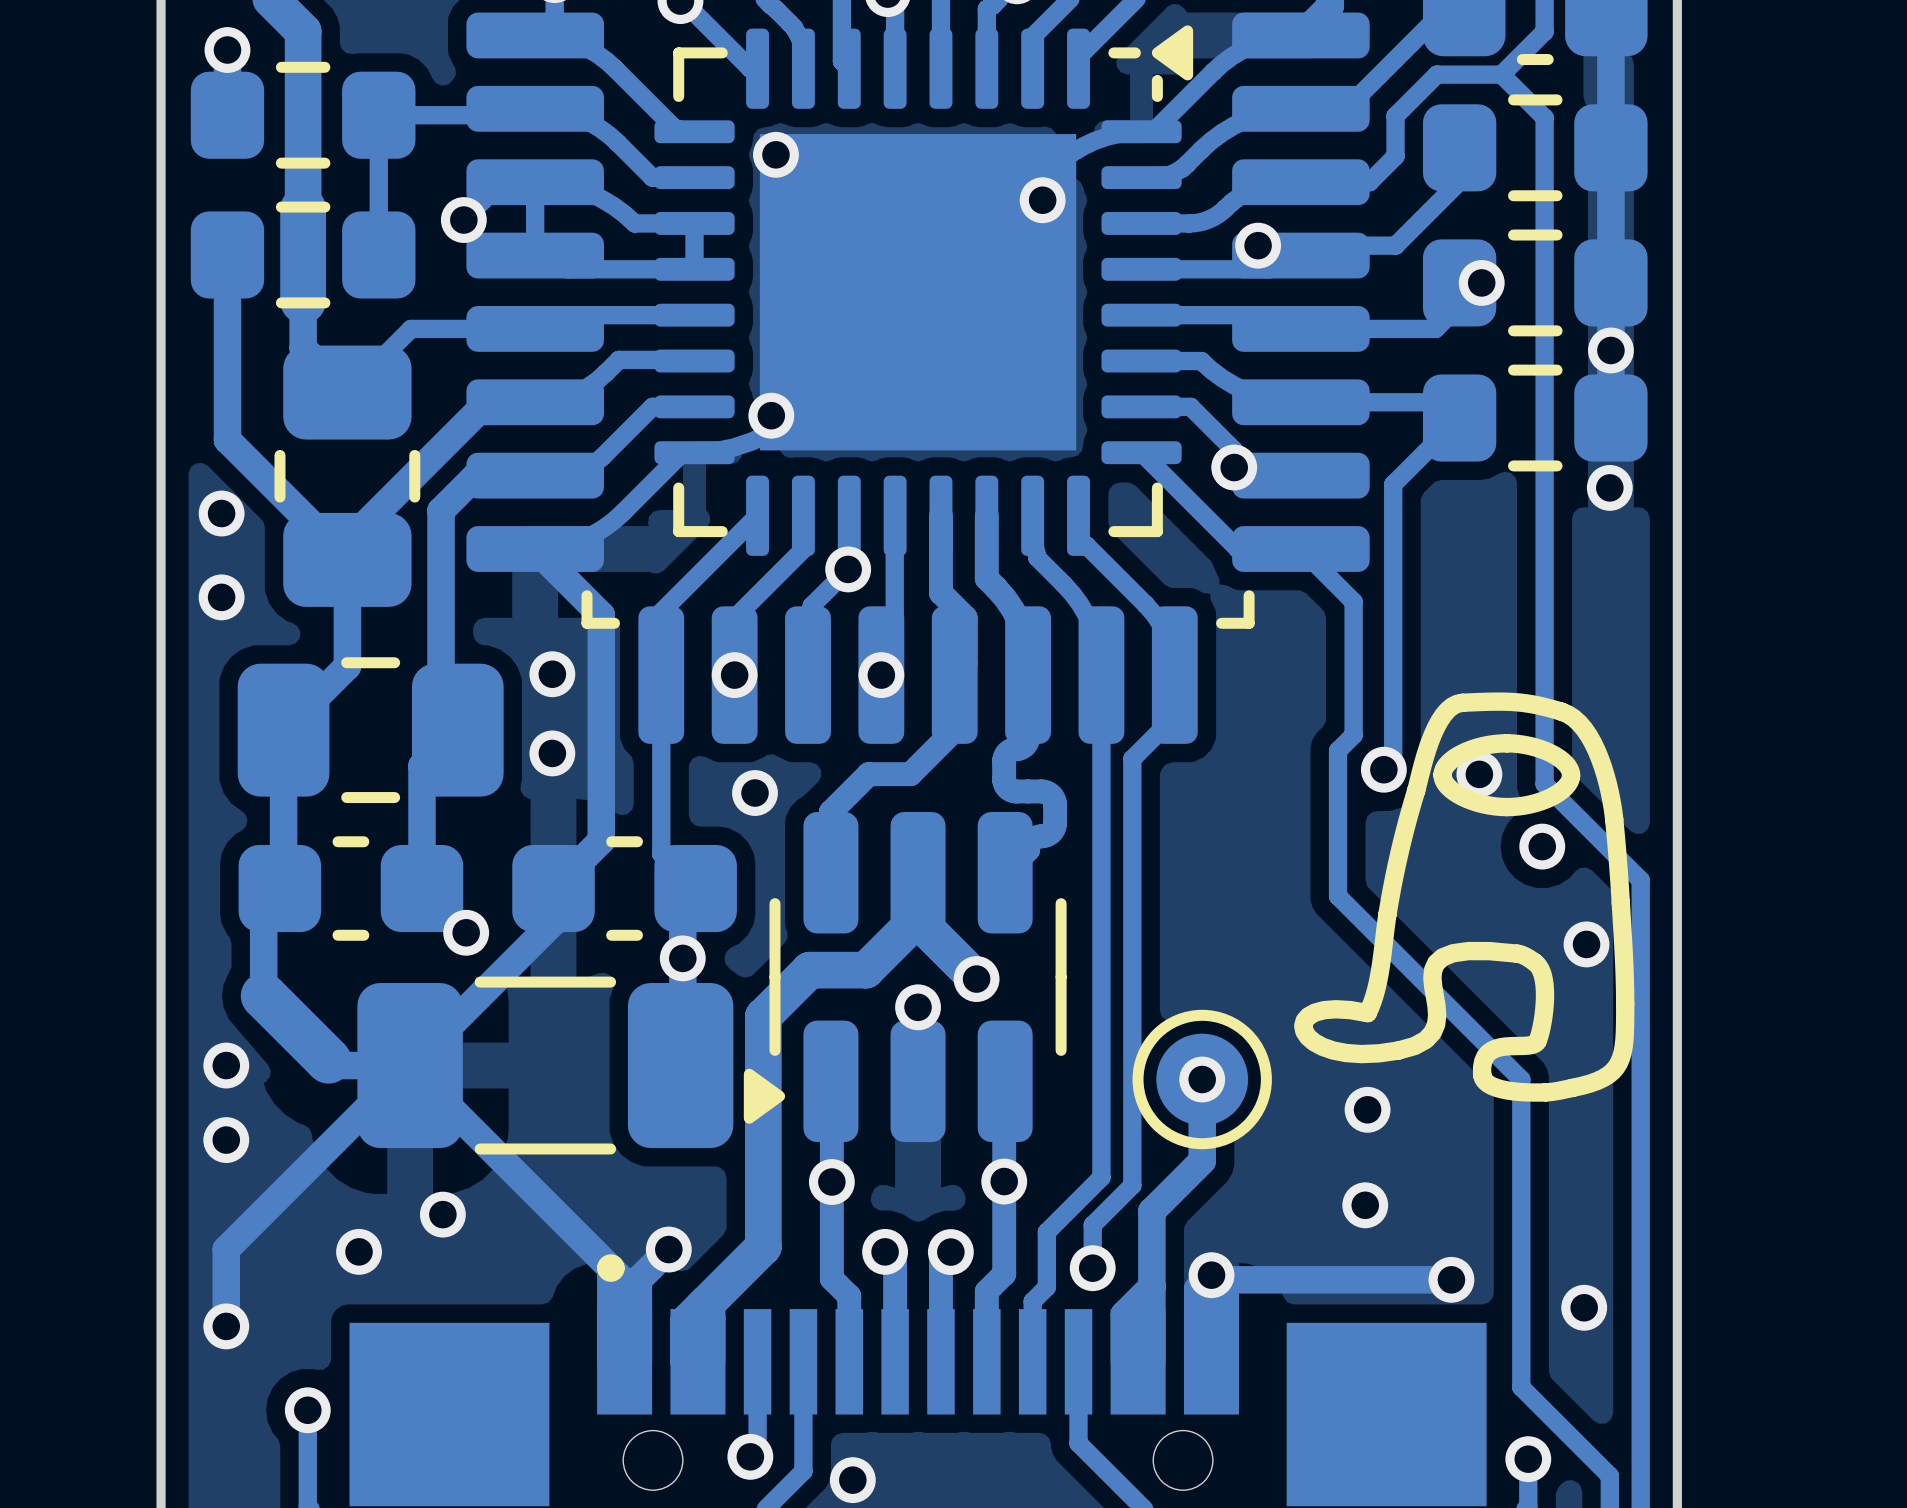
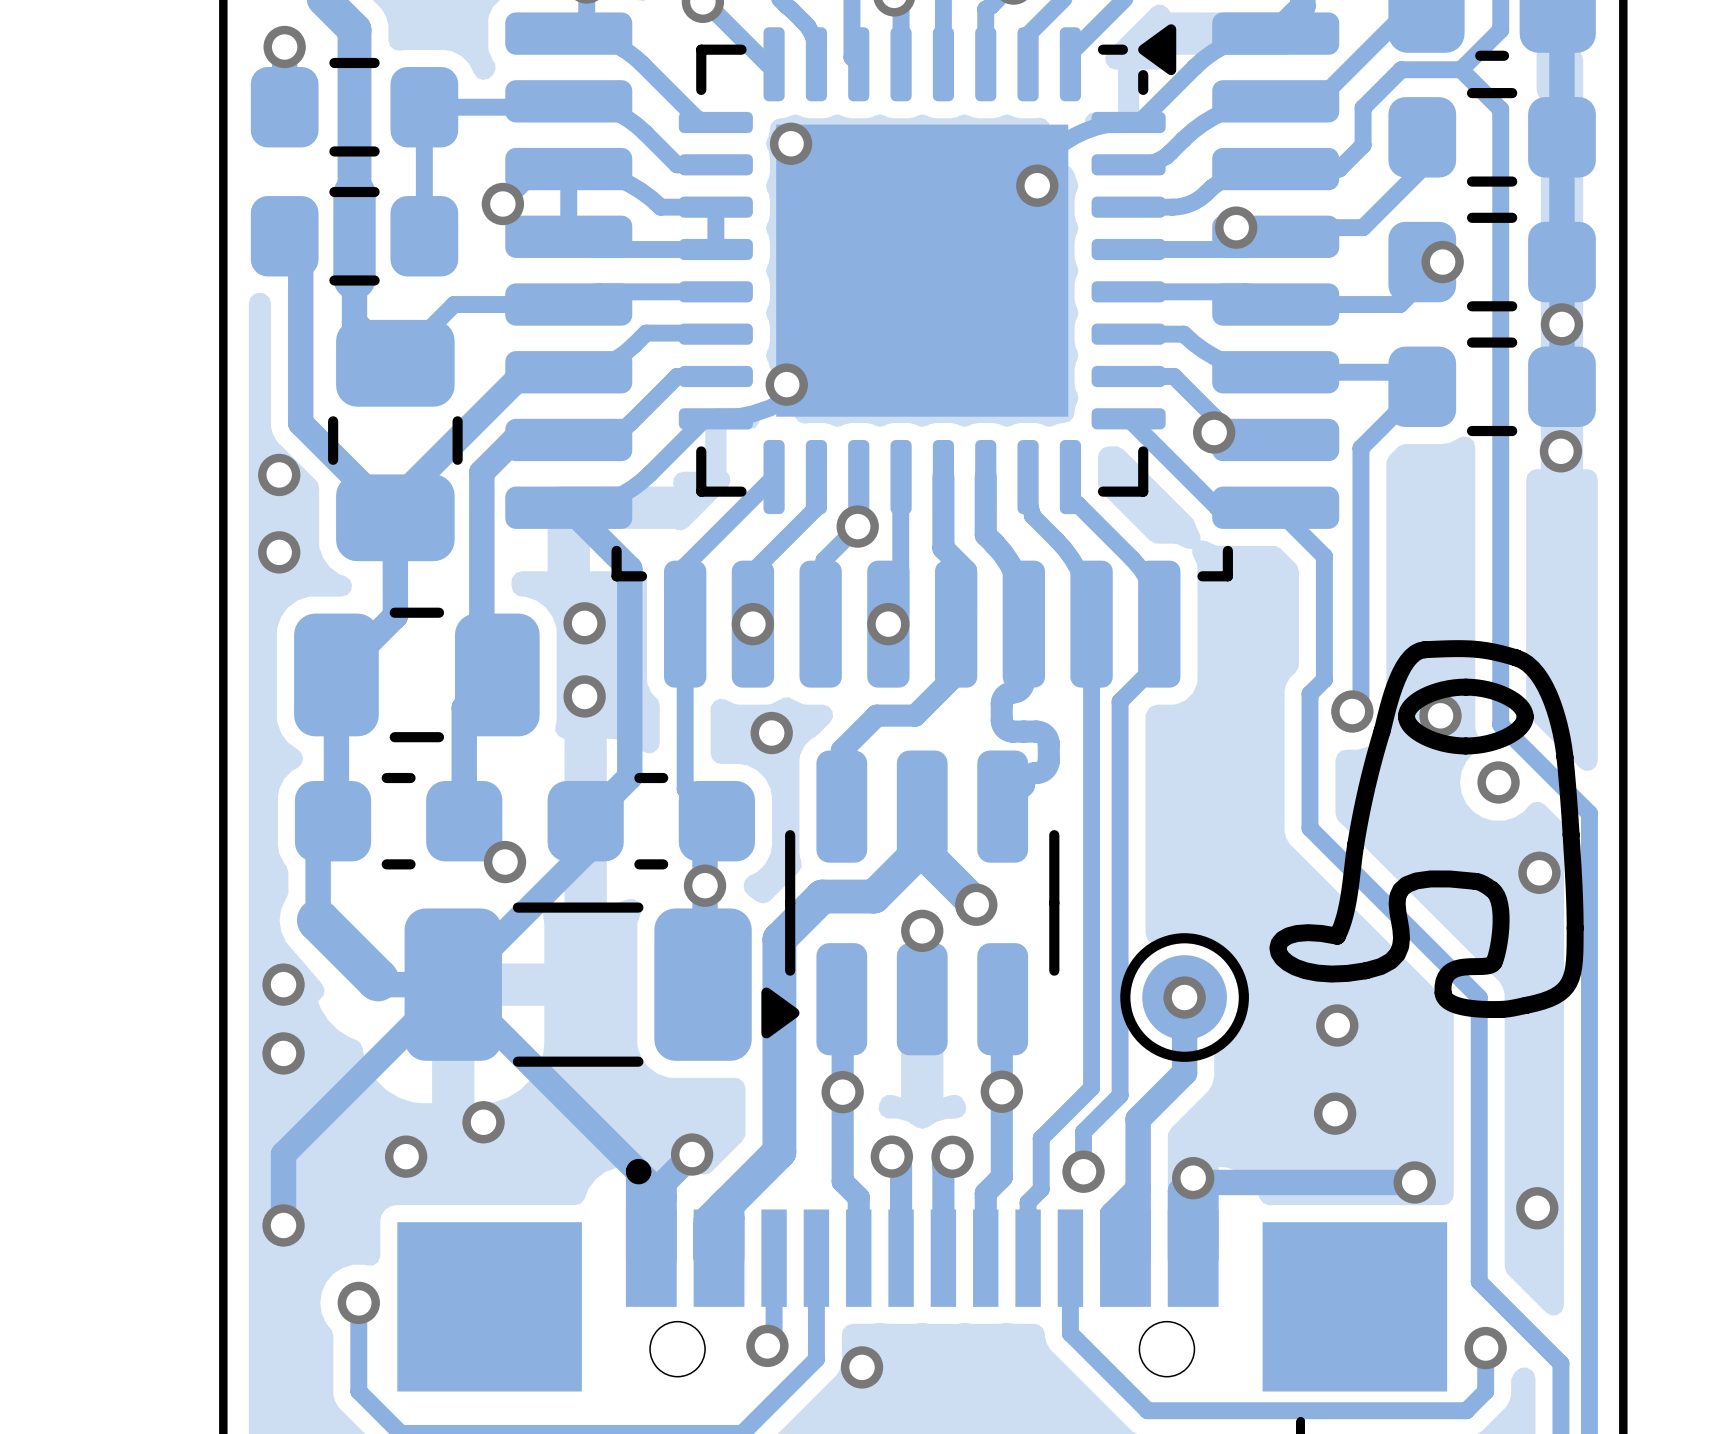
track: (227, 254) (227, 440) (244, 457) -> (284, 236) (300, 252) (300, 423)

